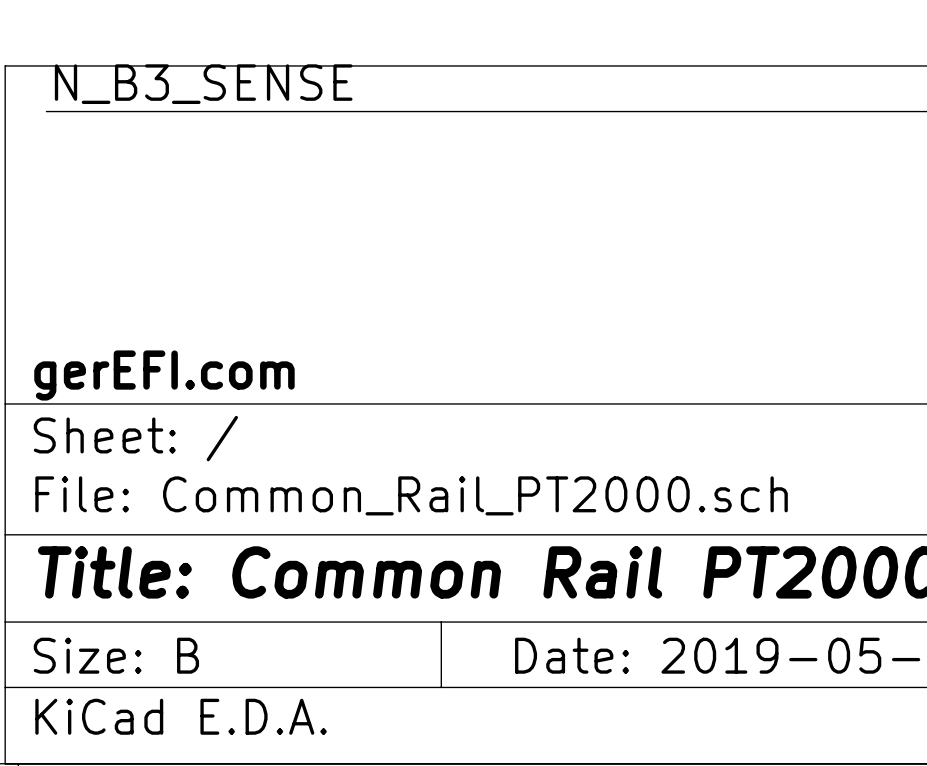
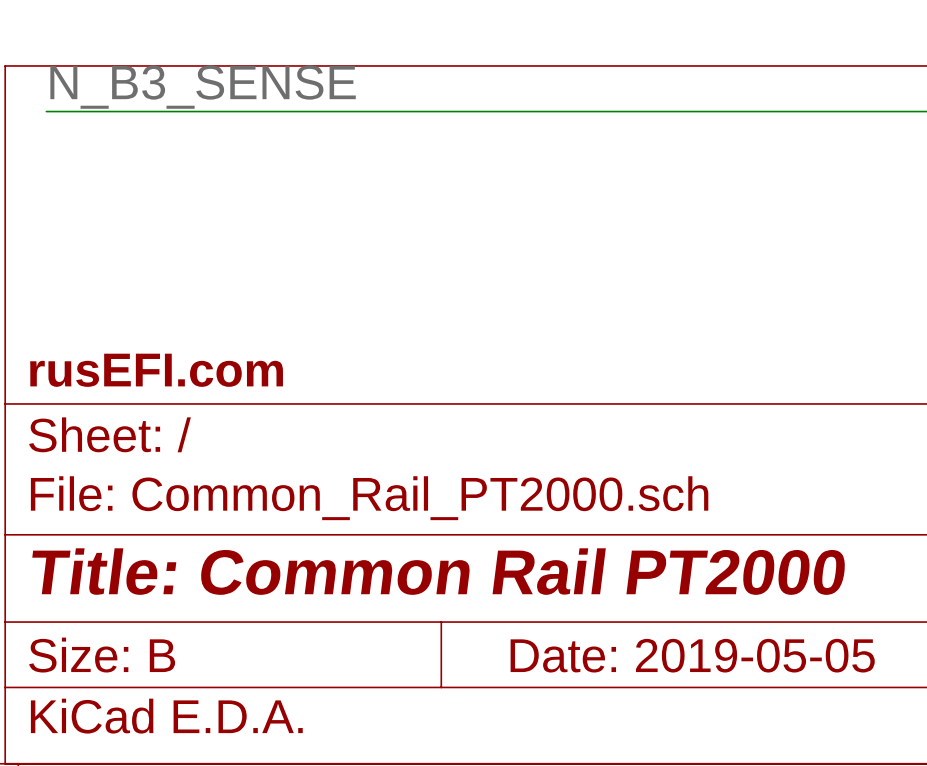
title block: gerEFI.com (164, 375) -> rusEFI.com (156, 370)

